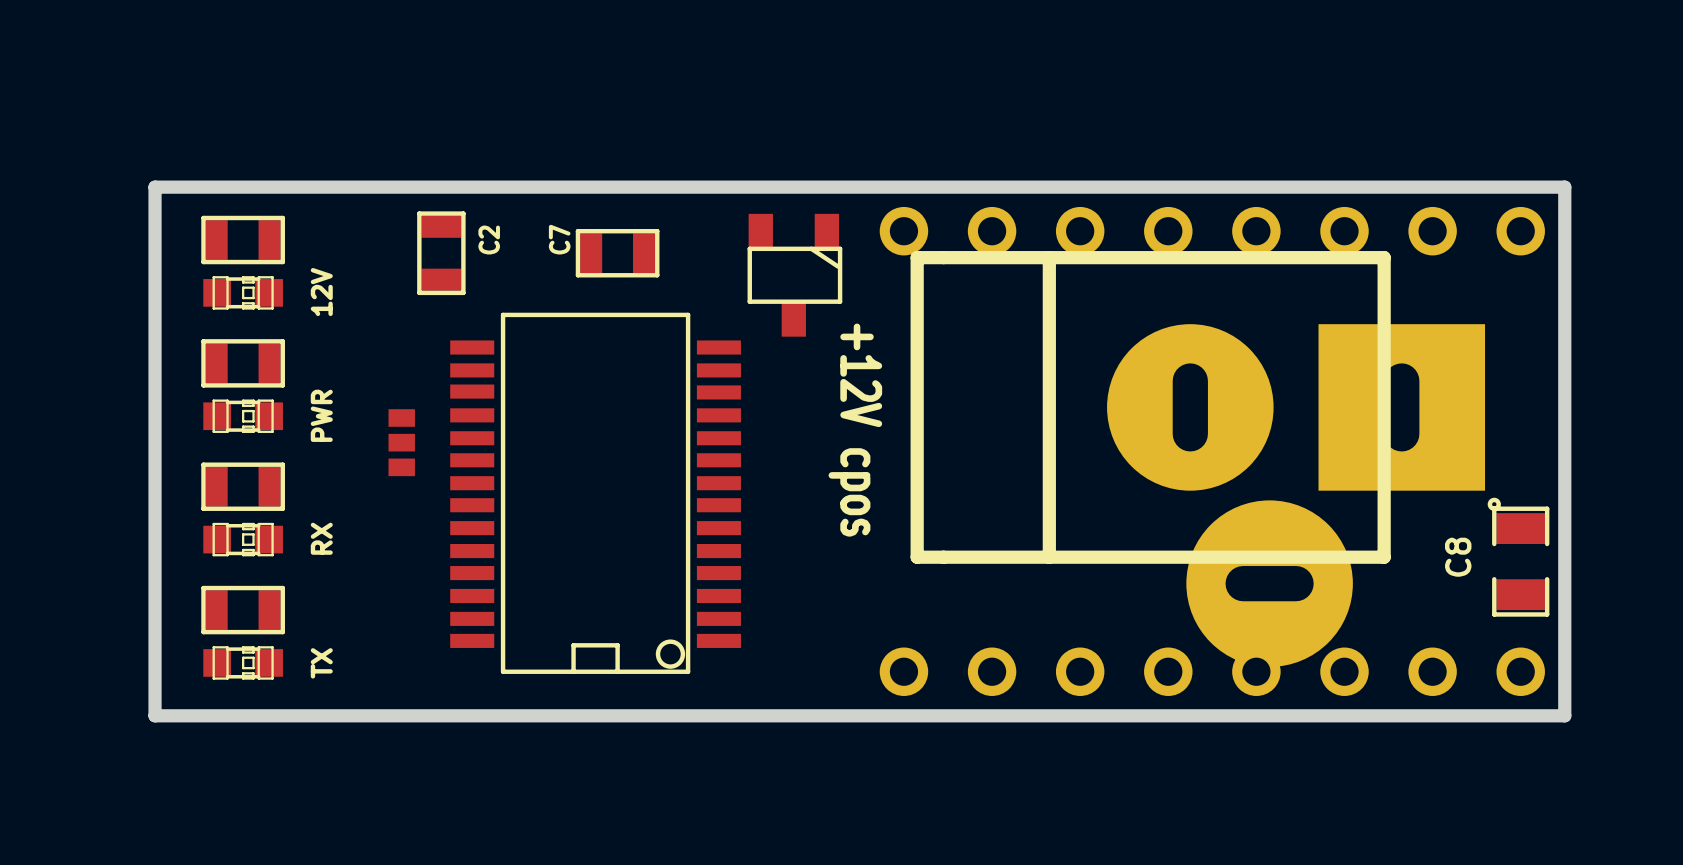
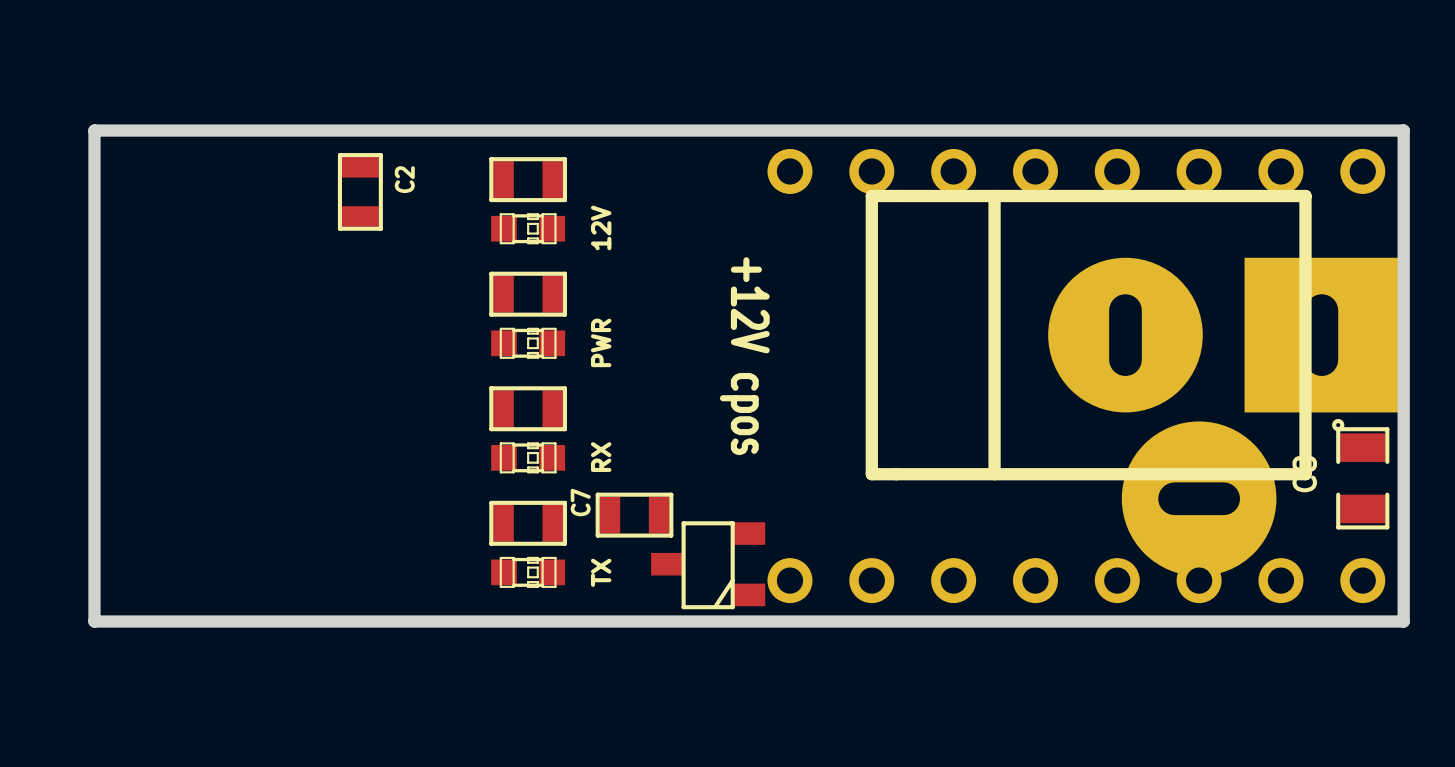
part: (243, 240) -> none
part: none -> (528, 179)
C7 position: (617, 253) -> (634, 515)
part rotation: 0° (794, 275) -> 90° clockwise (708, 565)
part position: (794, 275) -> (708, 565)
part position: (243, 292) -> (528, 228)
part: (243, 363) -> none
part: none -> (528, 294)
part position: (243, 416) -> (528, 343)
part: (401, 442) -> none
part position: (1197, 458) -> (1132, 382)
part: (243, 486) -> none
part: none -> (528, 408)
part: (595, 493) -> none
part position: (243, 539) -> (528, 457)
part: (243, 610) -> none
part: none -> (528, 523)
part position: (243, 662) -> (528, 572)

